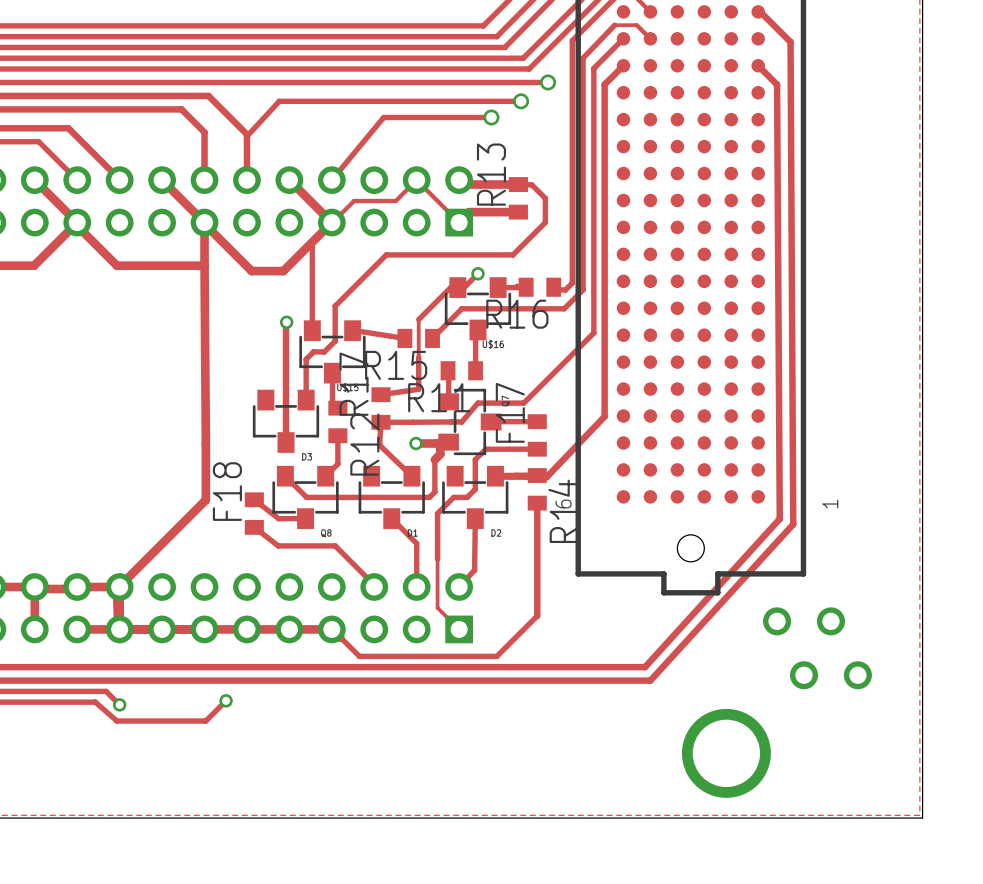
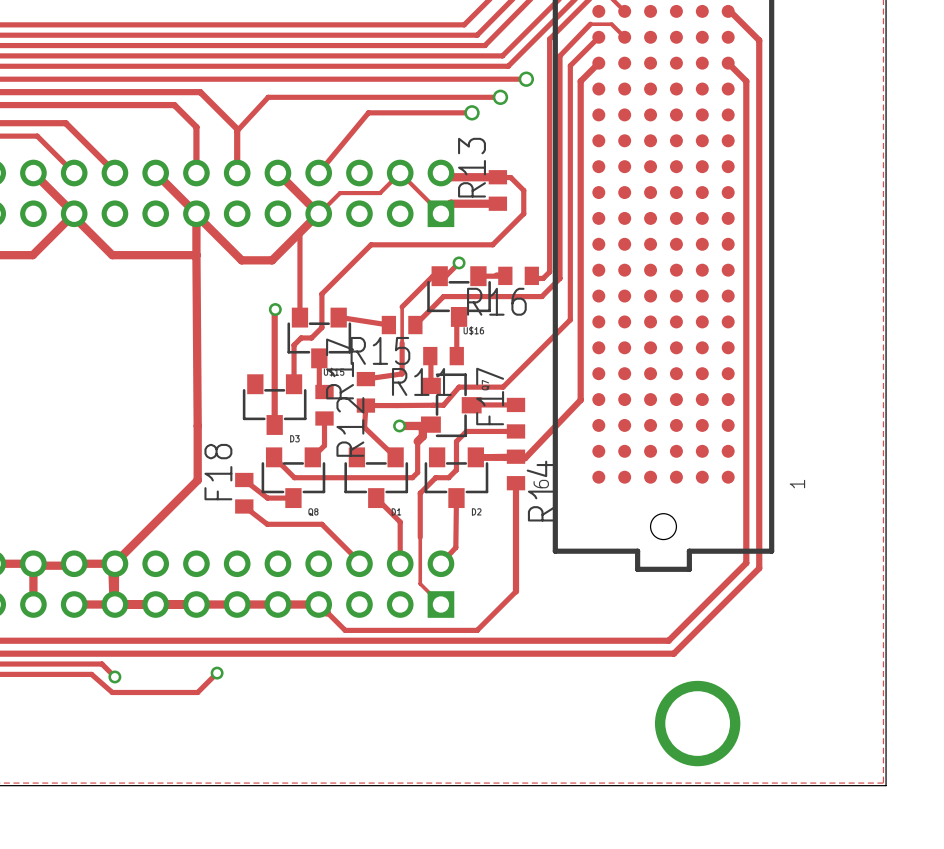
track: (790, 42) (793, 524) (650, 680) -> (759, 40) (759, 568) (673, 653) (624, 653)
track: (777, 84) (779, 518) (645, 667) -> (746, 81) (746, 563) (668, 640) (619, 640)
part: (817, 648) -> none

